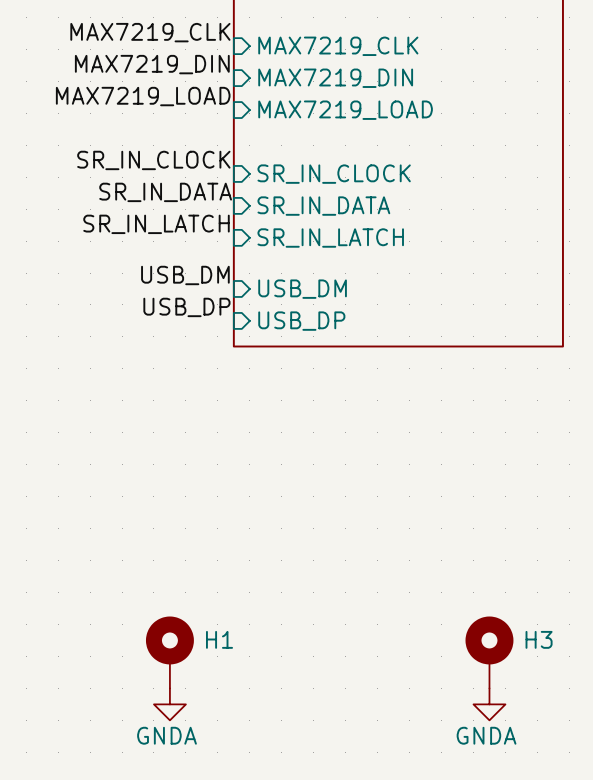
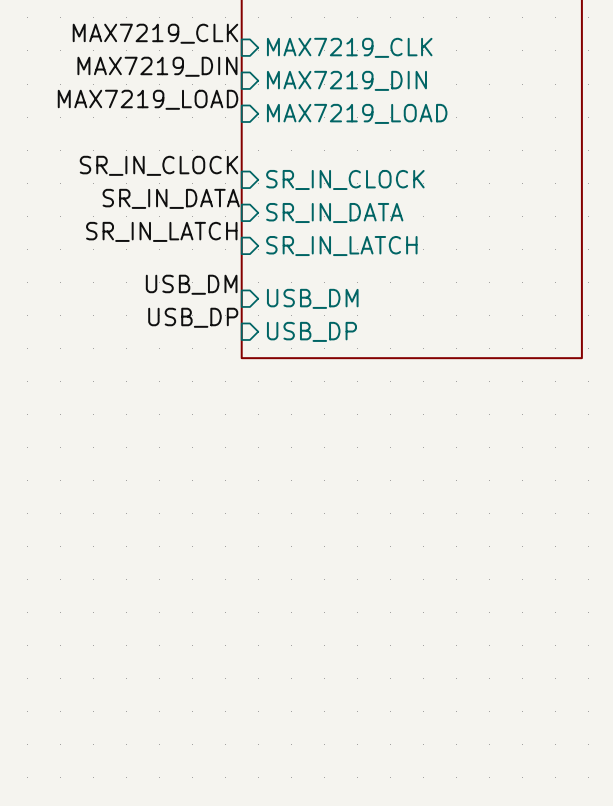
H1: (169, 652) -> none
H3: (489, 652) -> none
power symbol: GNDA (169, 704) -> none
power symbol: GNDA (489, 704) -> none

